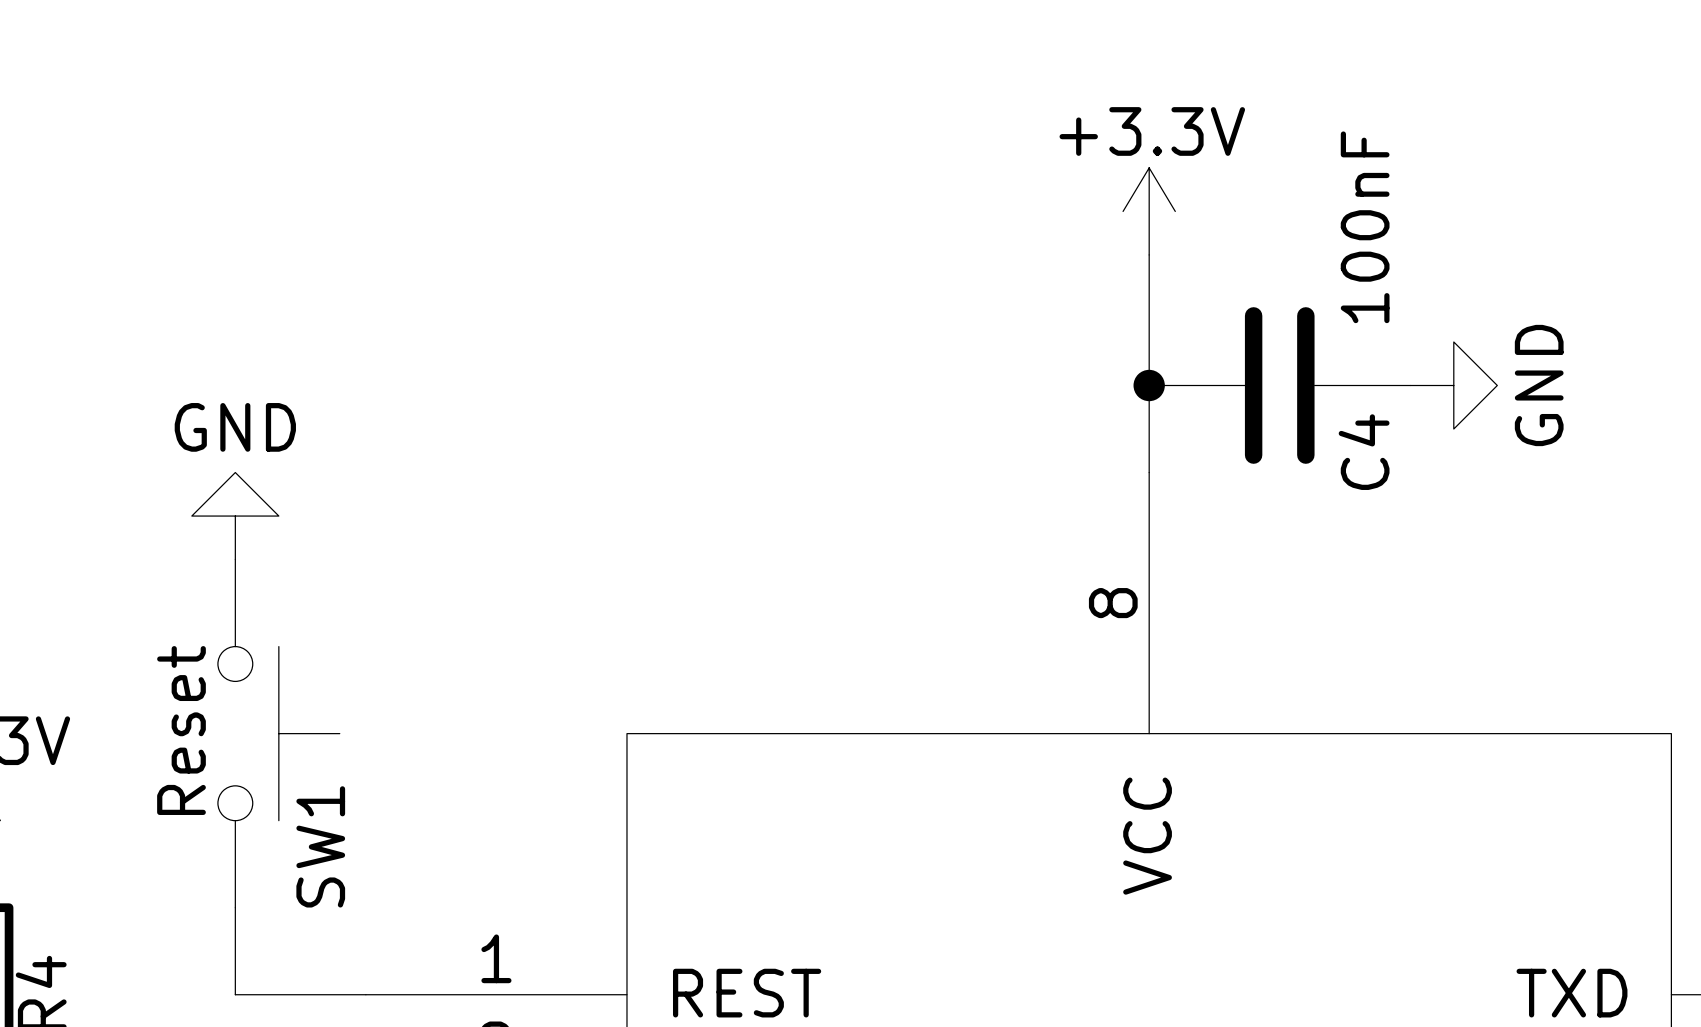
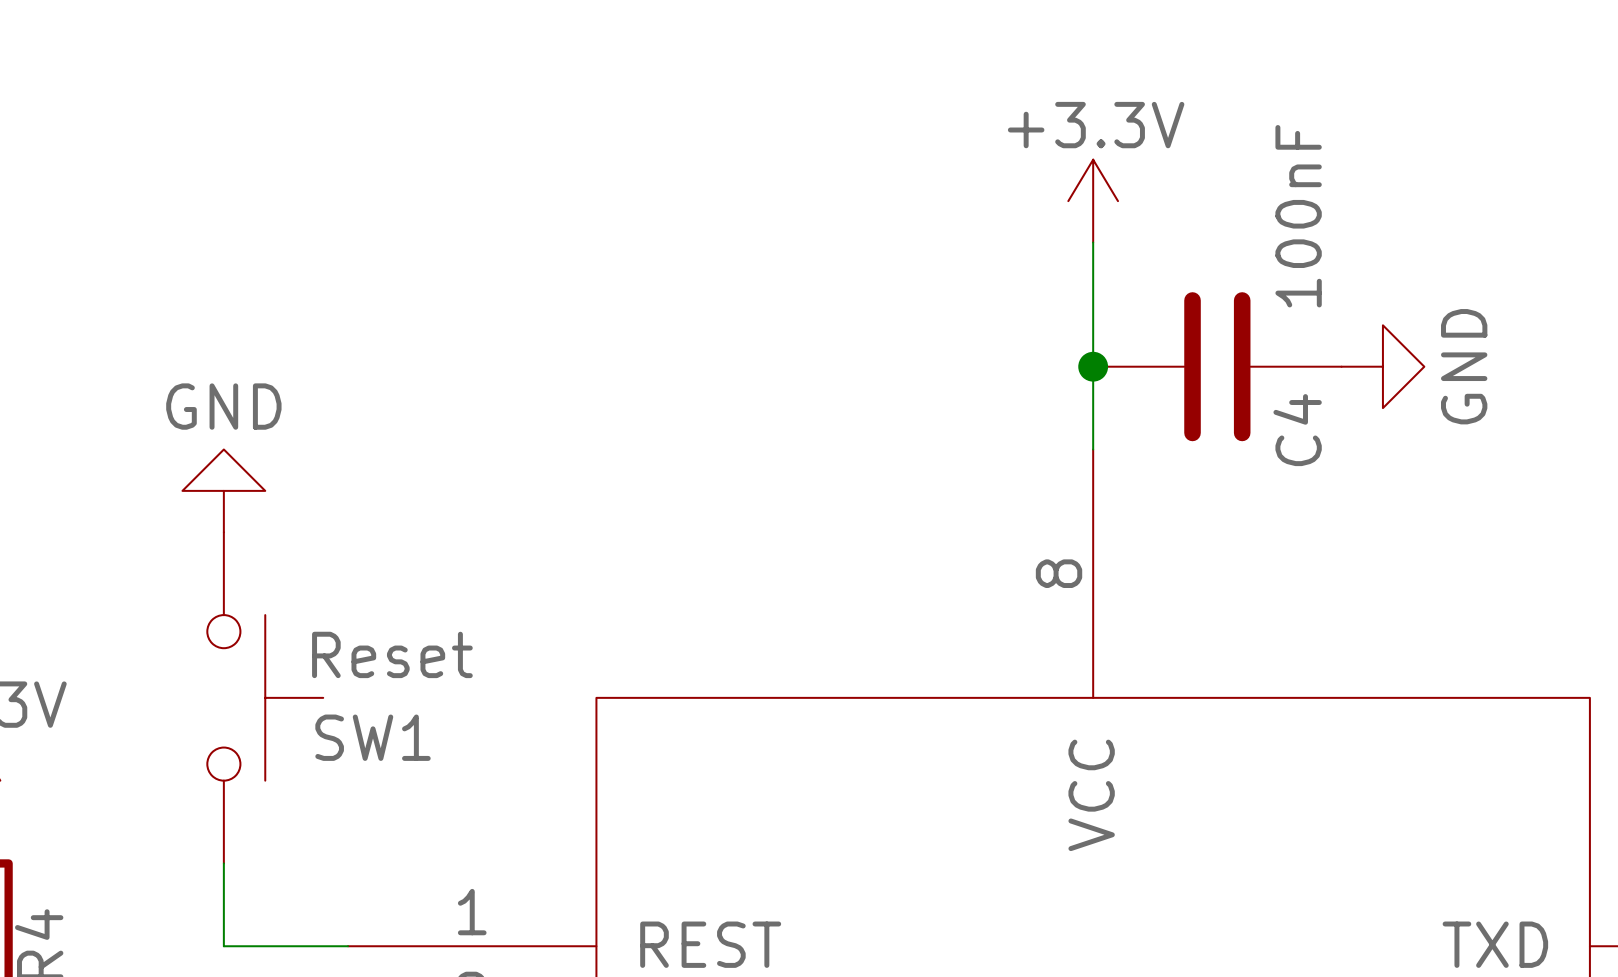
SW1 value rotation: 0° (181, 730) -> 90° clockwise (392, 654)
SW1 value position: Reset (181, 730) -> Reset (392, 654)
SW1 name rotation: 0° (320, 846) -> 90° clockwise (373, 737)

